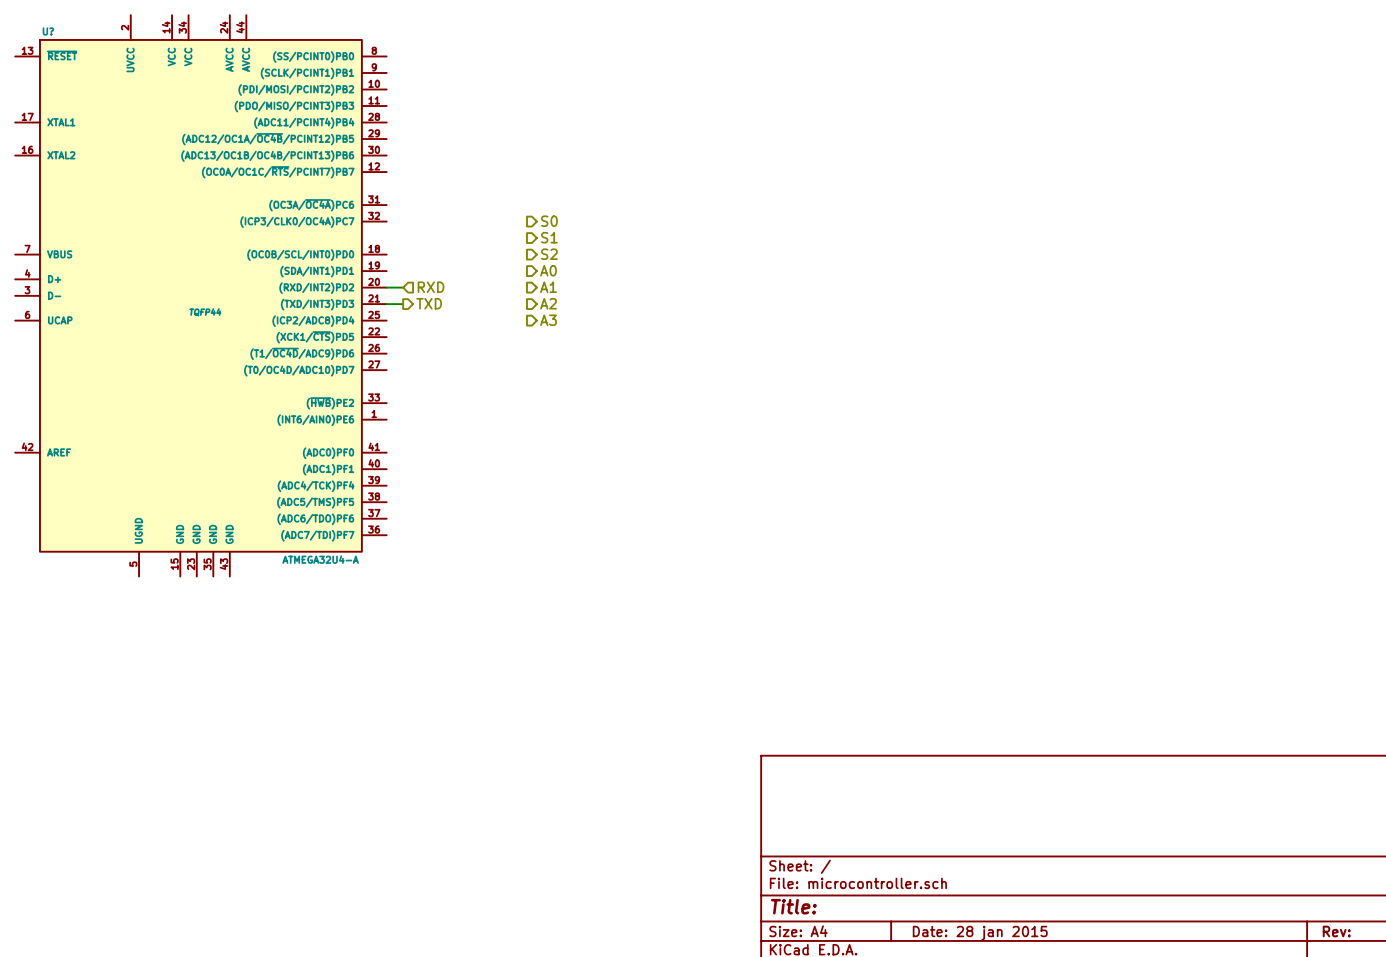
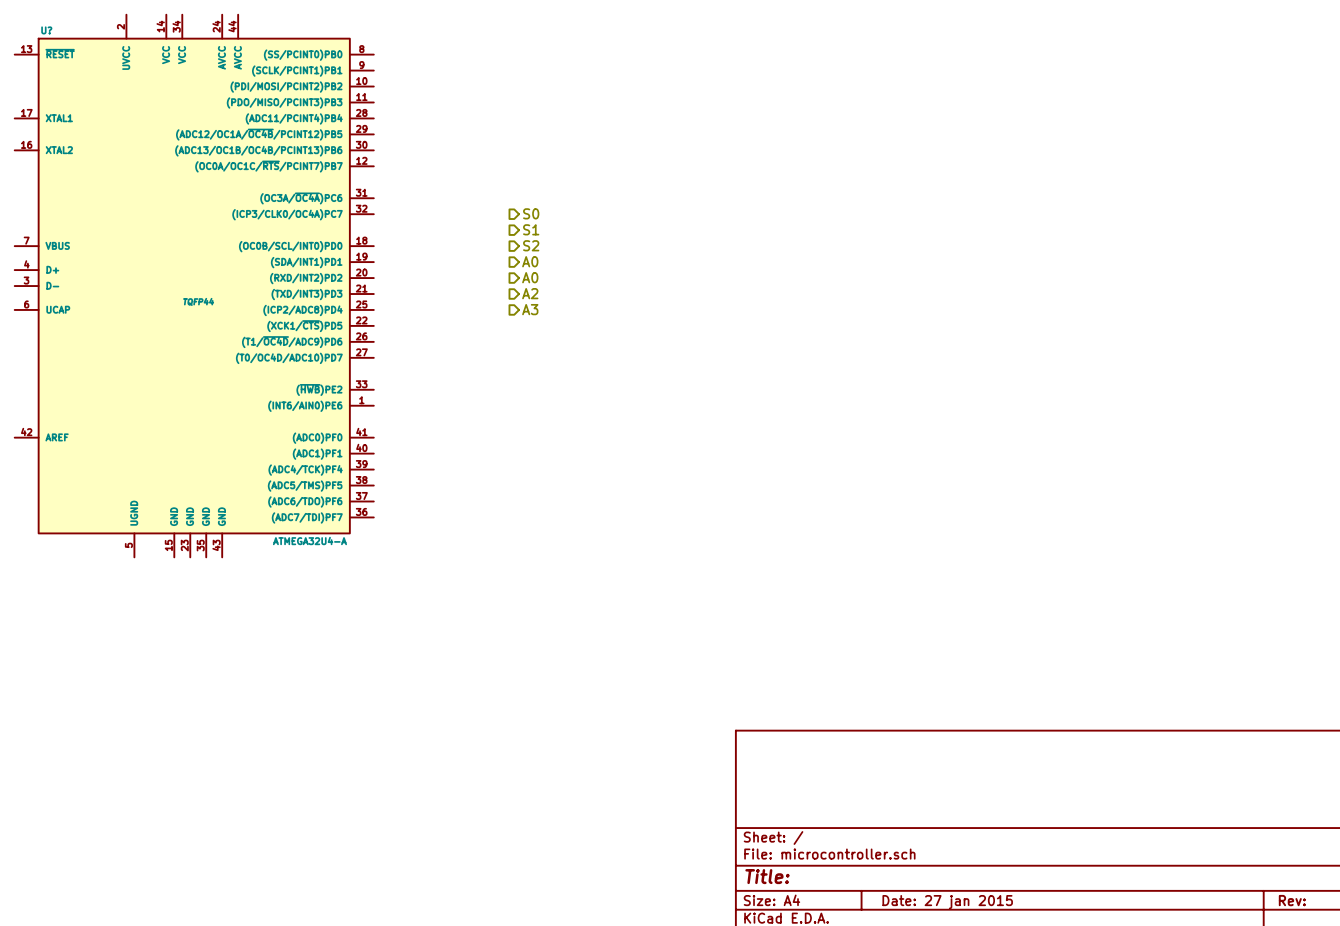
wire: (386, 287) (403, 287) -> none
hierarchical label: RXD (431, 287) -> none
hierarchical label: A1 (548, 287) -> A0 (530, 277)
hierarchical label: TXD (429, 303) -> none
wire: (386, 304) (403, 304) -> none
title block: Date: 28 jan 2015 (980, 933) -> Date: 27 jan 2015 (947, 902)

